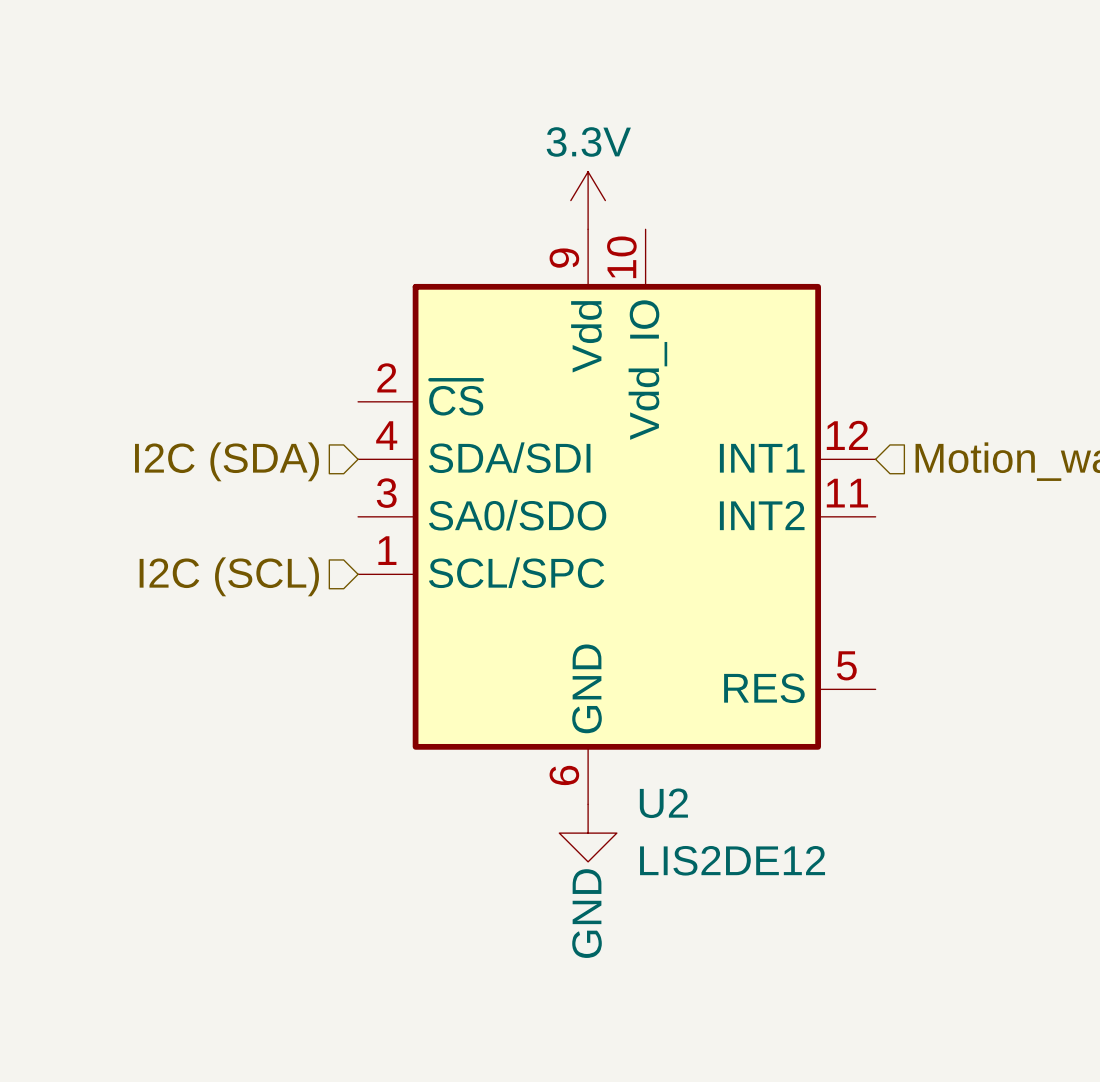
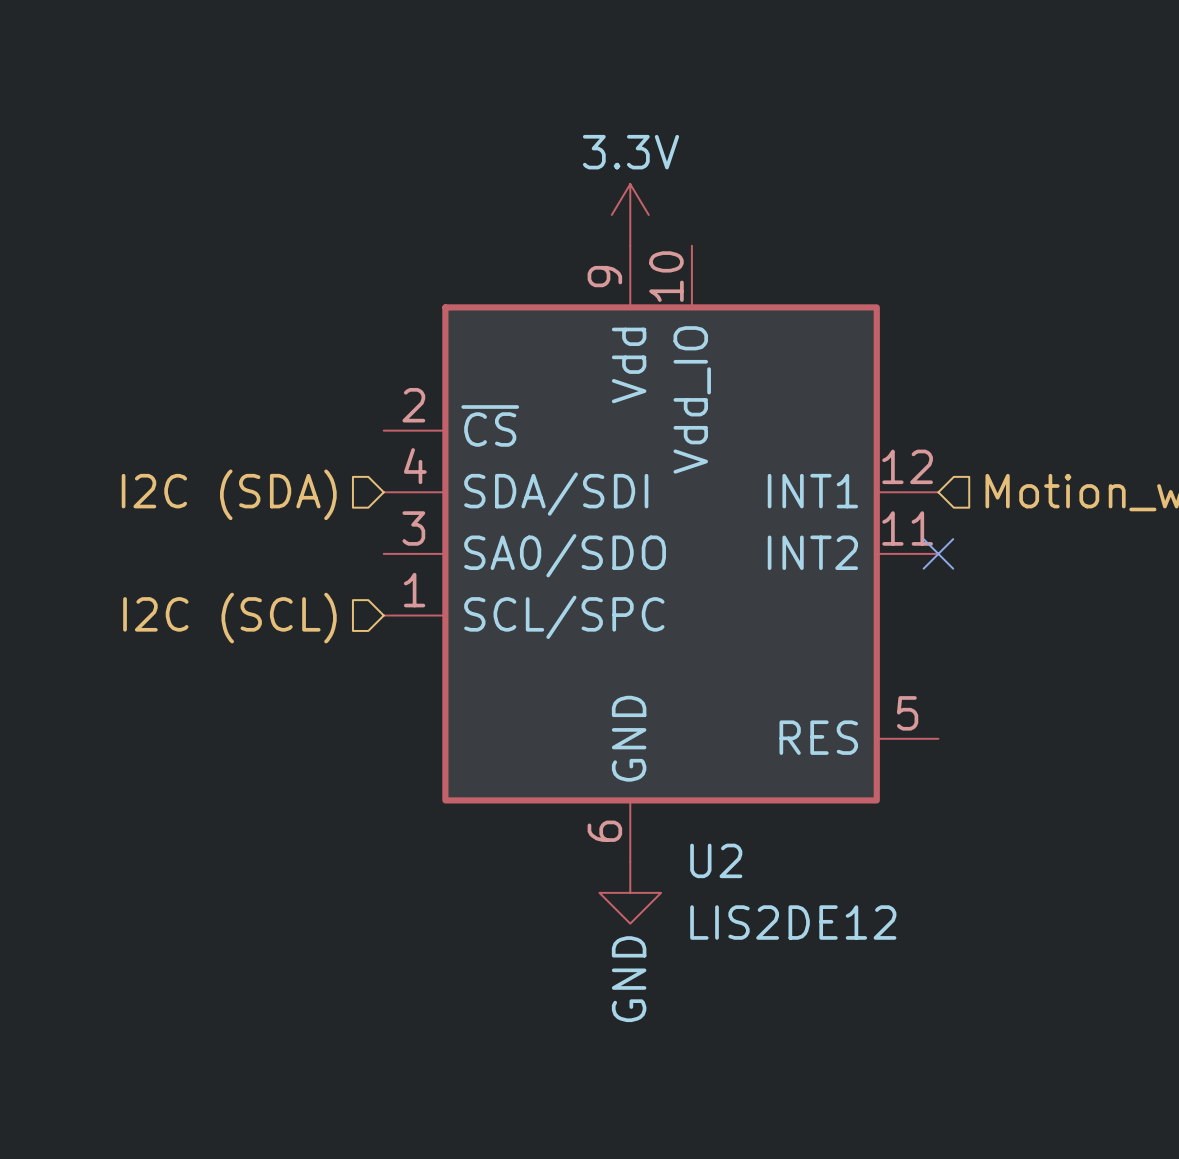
no-connect mark: none -> (938, 553)

